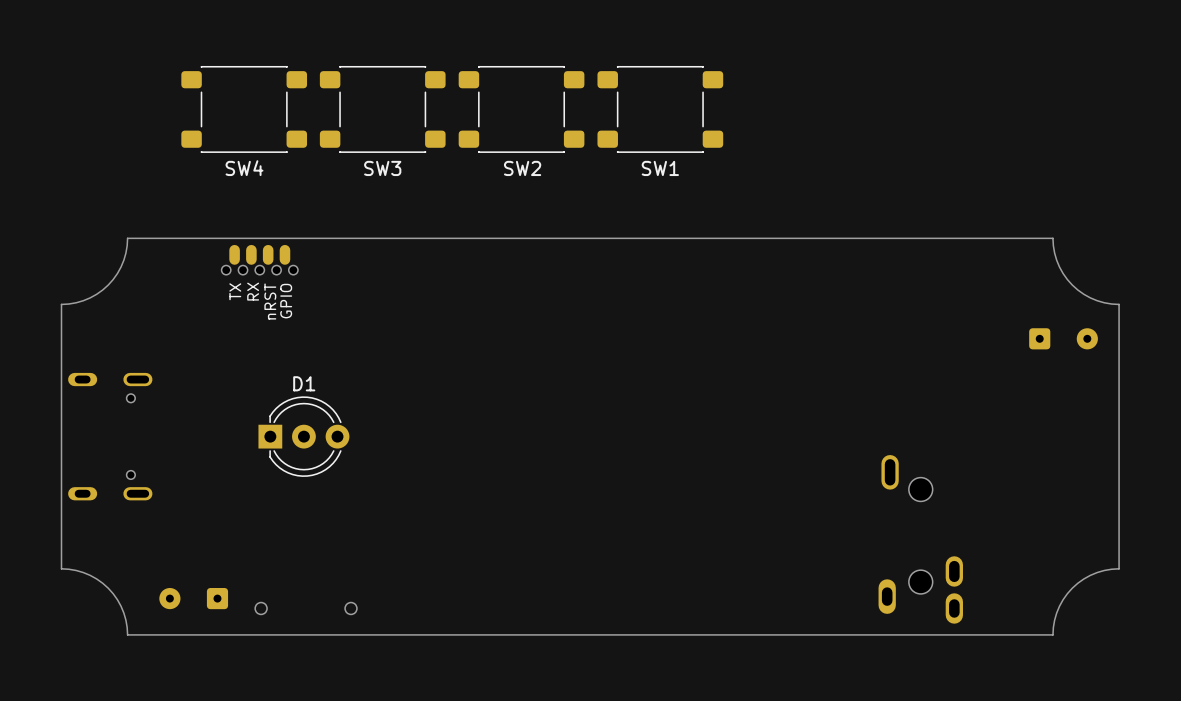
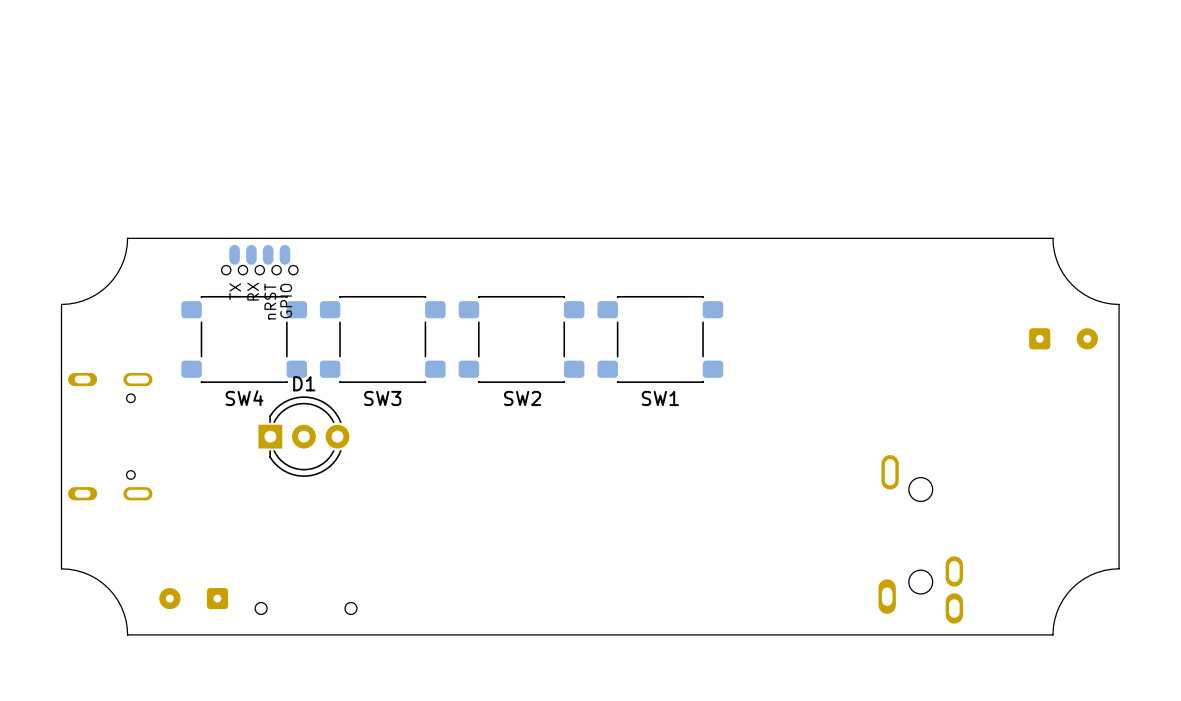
SW4 position: (244, 109) -> (244, 339)
SW3 position: (382, 109) -> (382, 339)
SW2 position: (521, 109) -> (521, 339)
SW1 position: (660, 109) -> (660, 339)

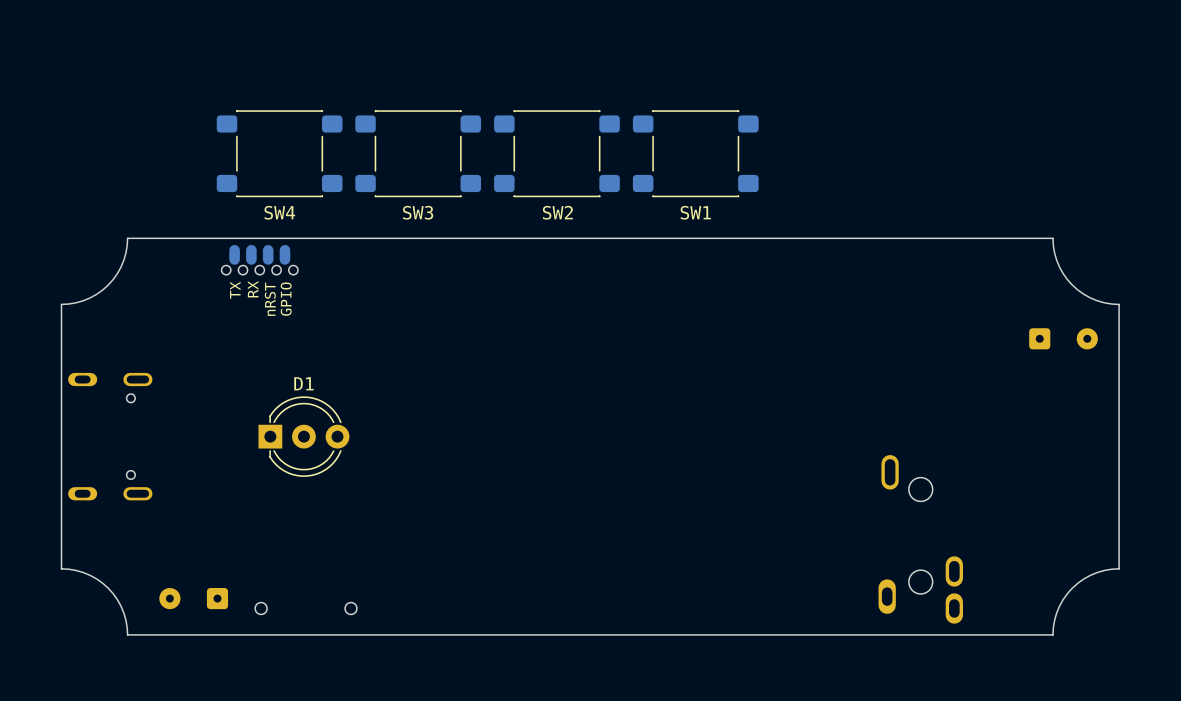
SW4 position: (244, 339) -> (279, 153)
SW3 position: (382, 339) -> (418, 153)
SW2 position: (521, 339) -> (556, 153)
SW1 position: (660, 339) -> (695, 153)

